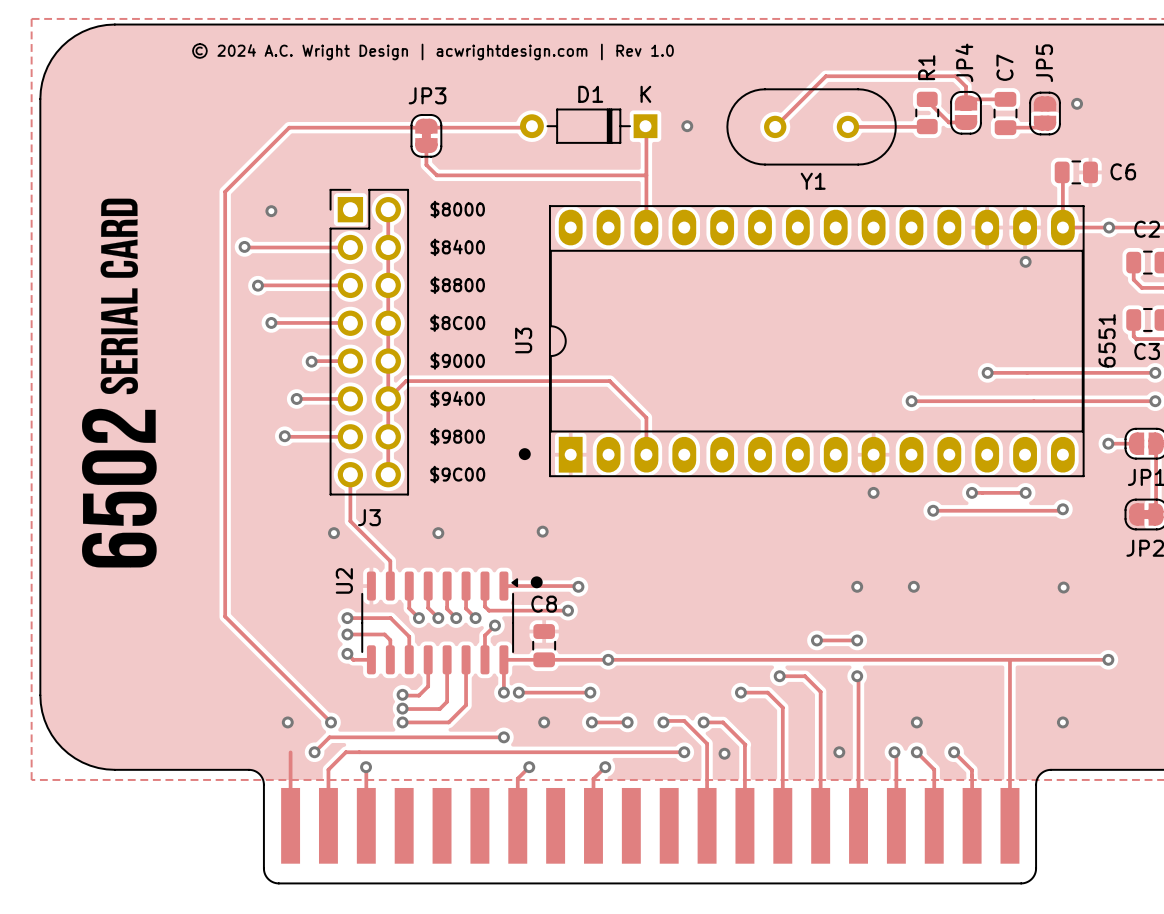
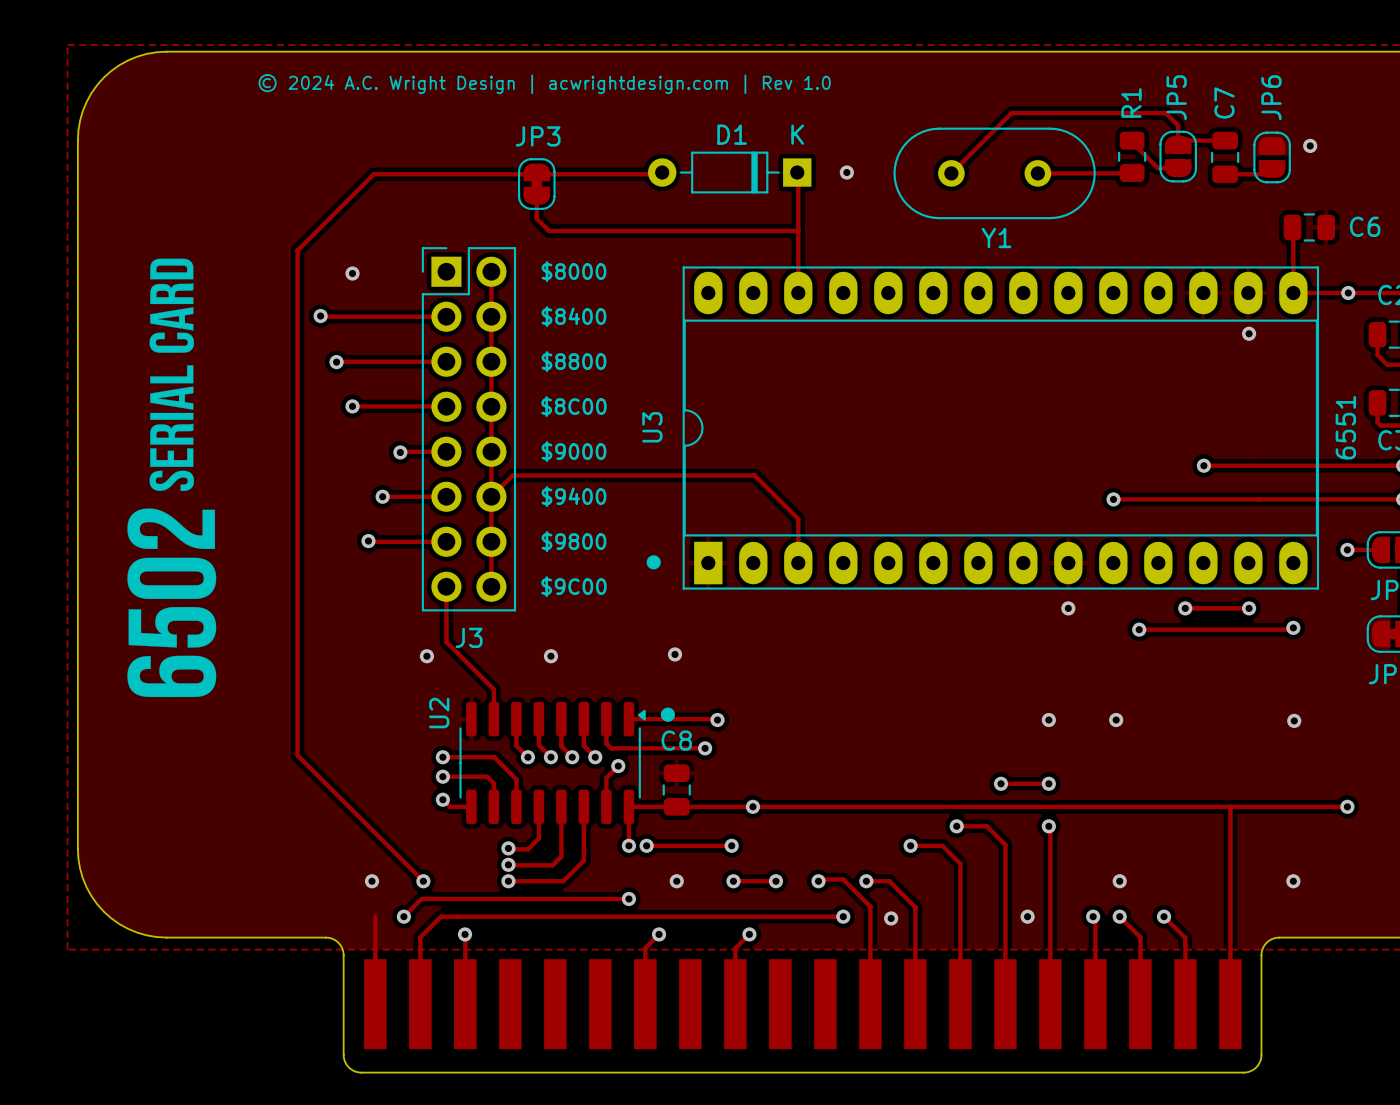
JP4 name: JP4 (964, 62) -> JP5 (1176, 97)
JP5 name: JP5 (1044, 63) -> JP6 (1271, 97)

